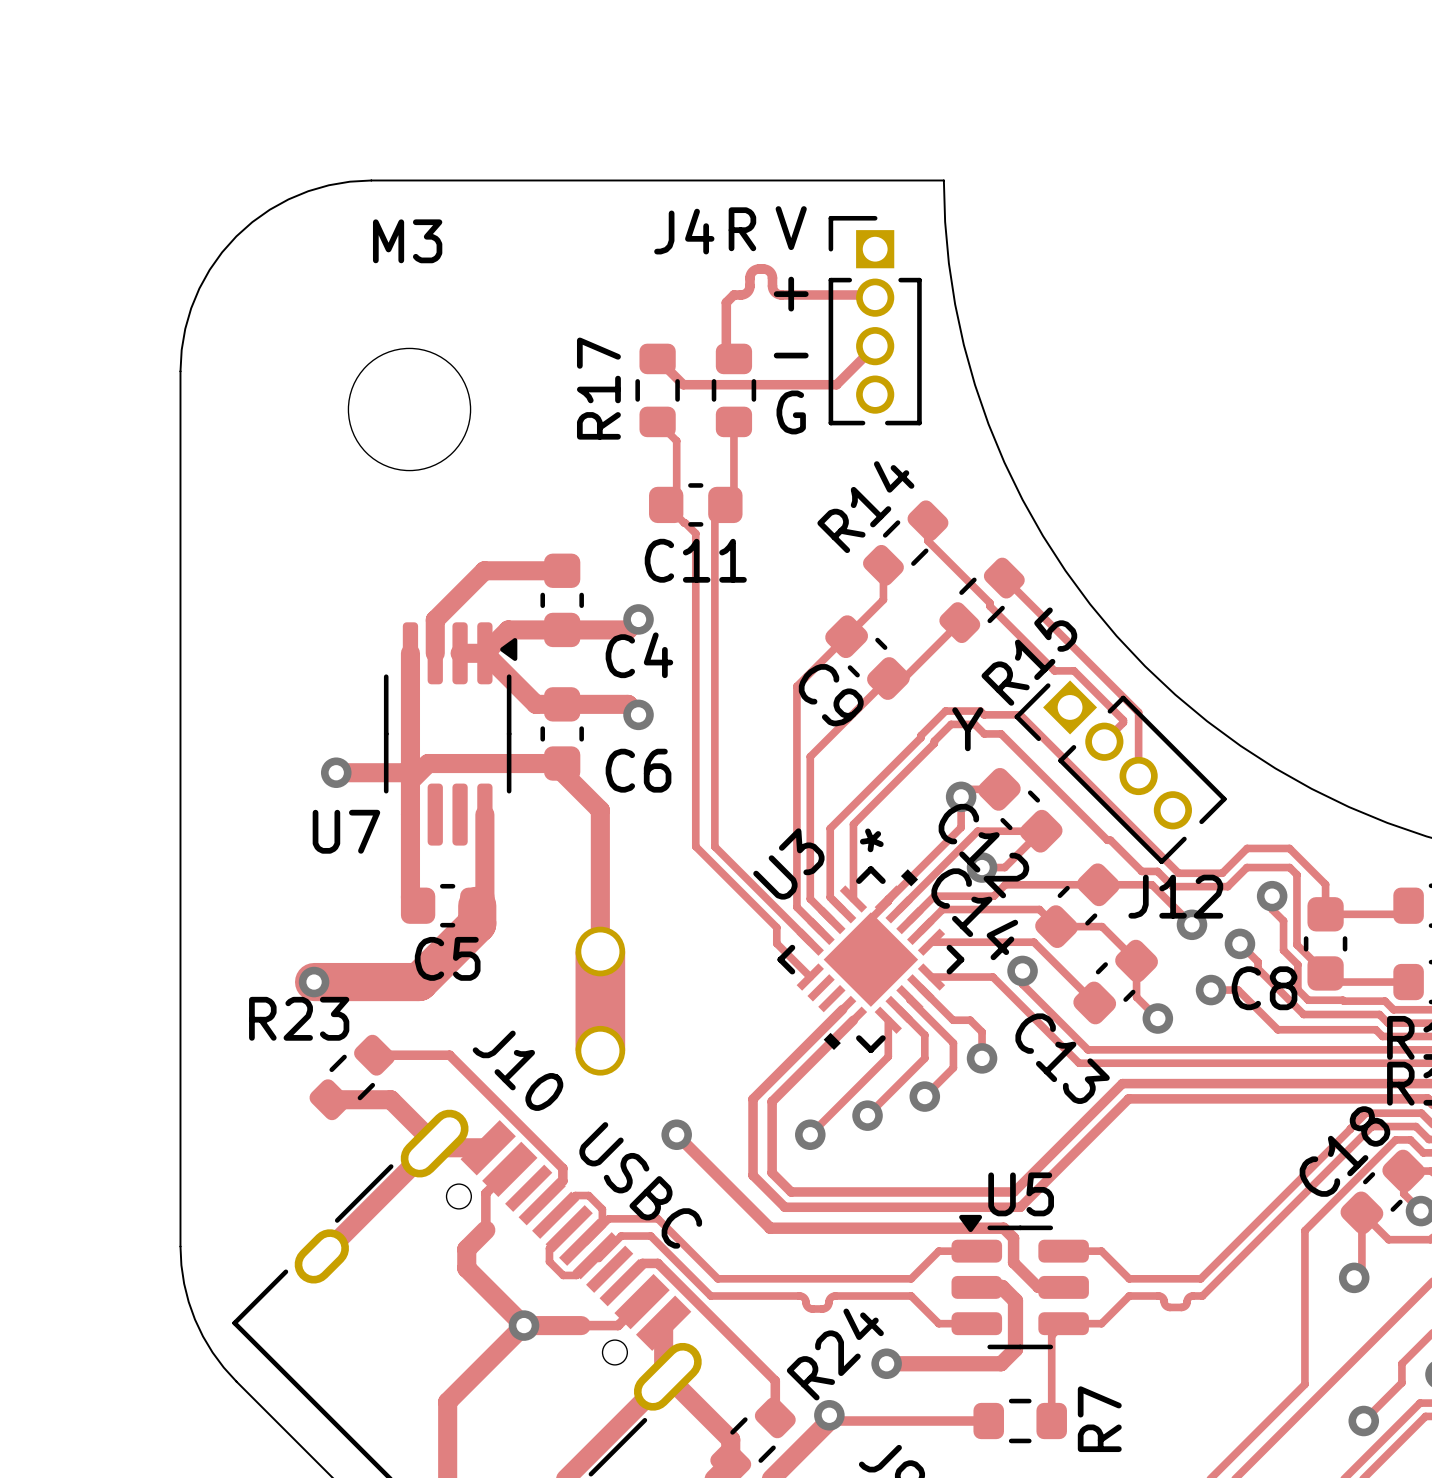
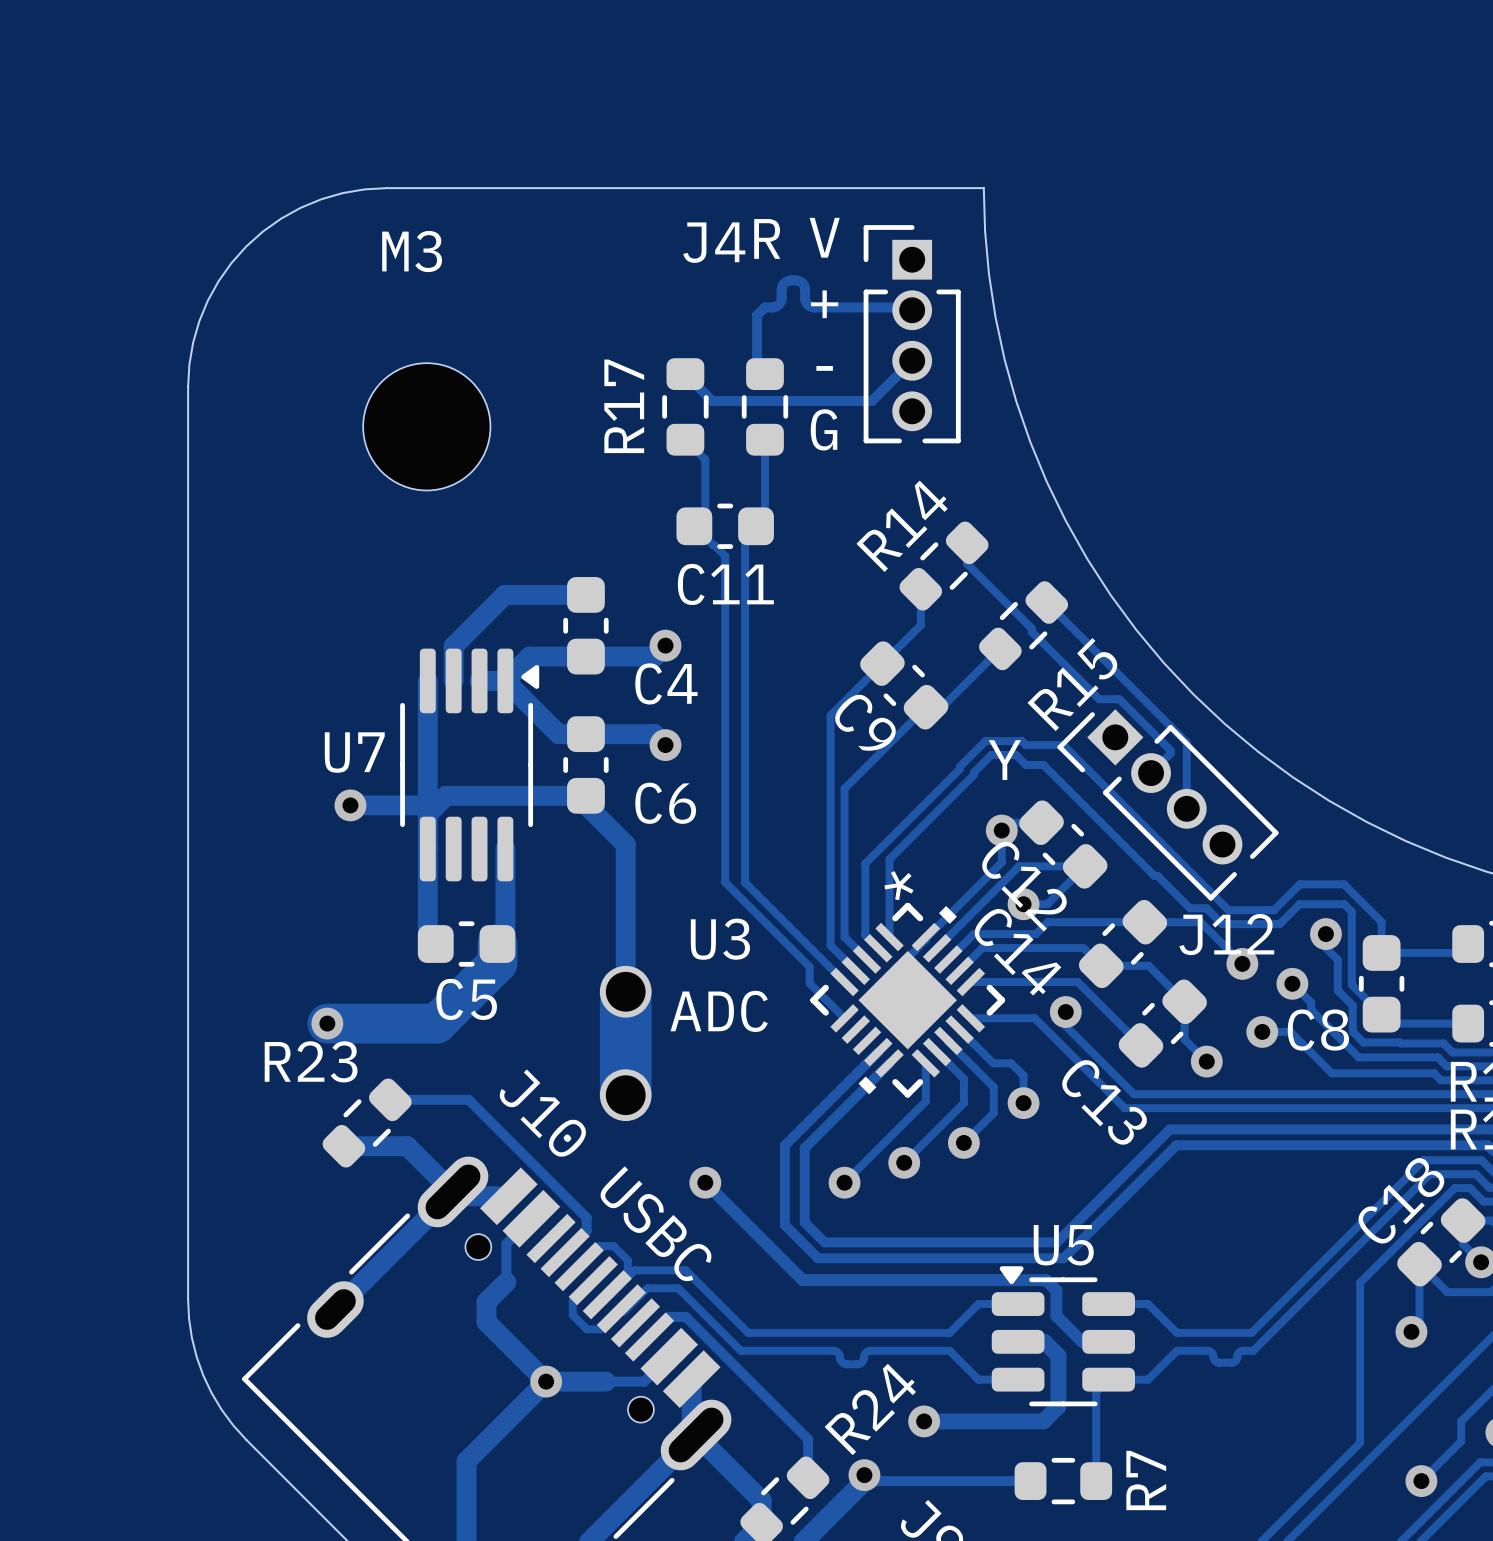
U7 name position: U7 (346, 831) -> U7 (354, 752)
U3 name rotation: 0° (788, 863) -> 45° clockwise (720, 939)
text: none -> ADC (719, 1011)

